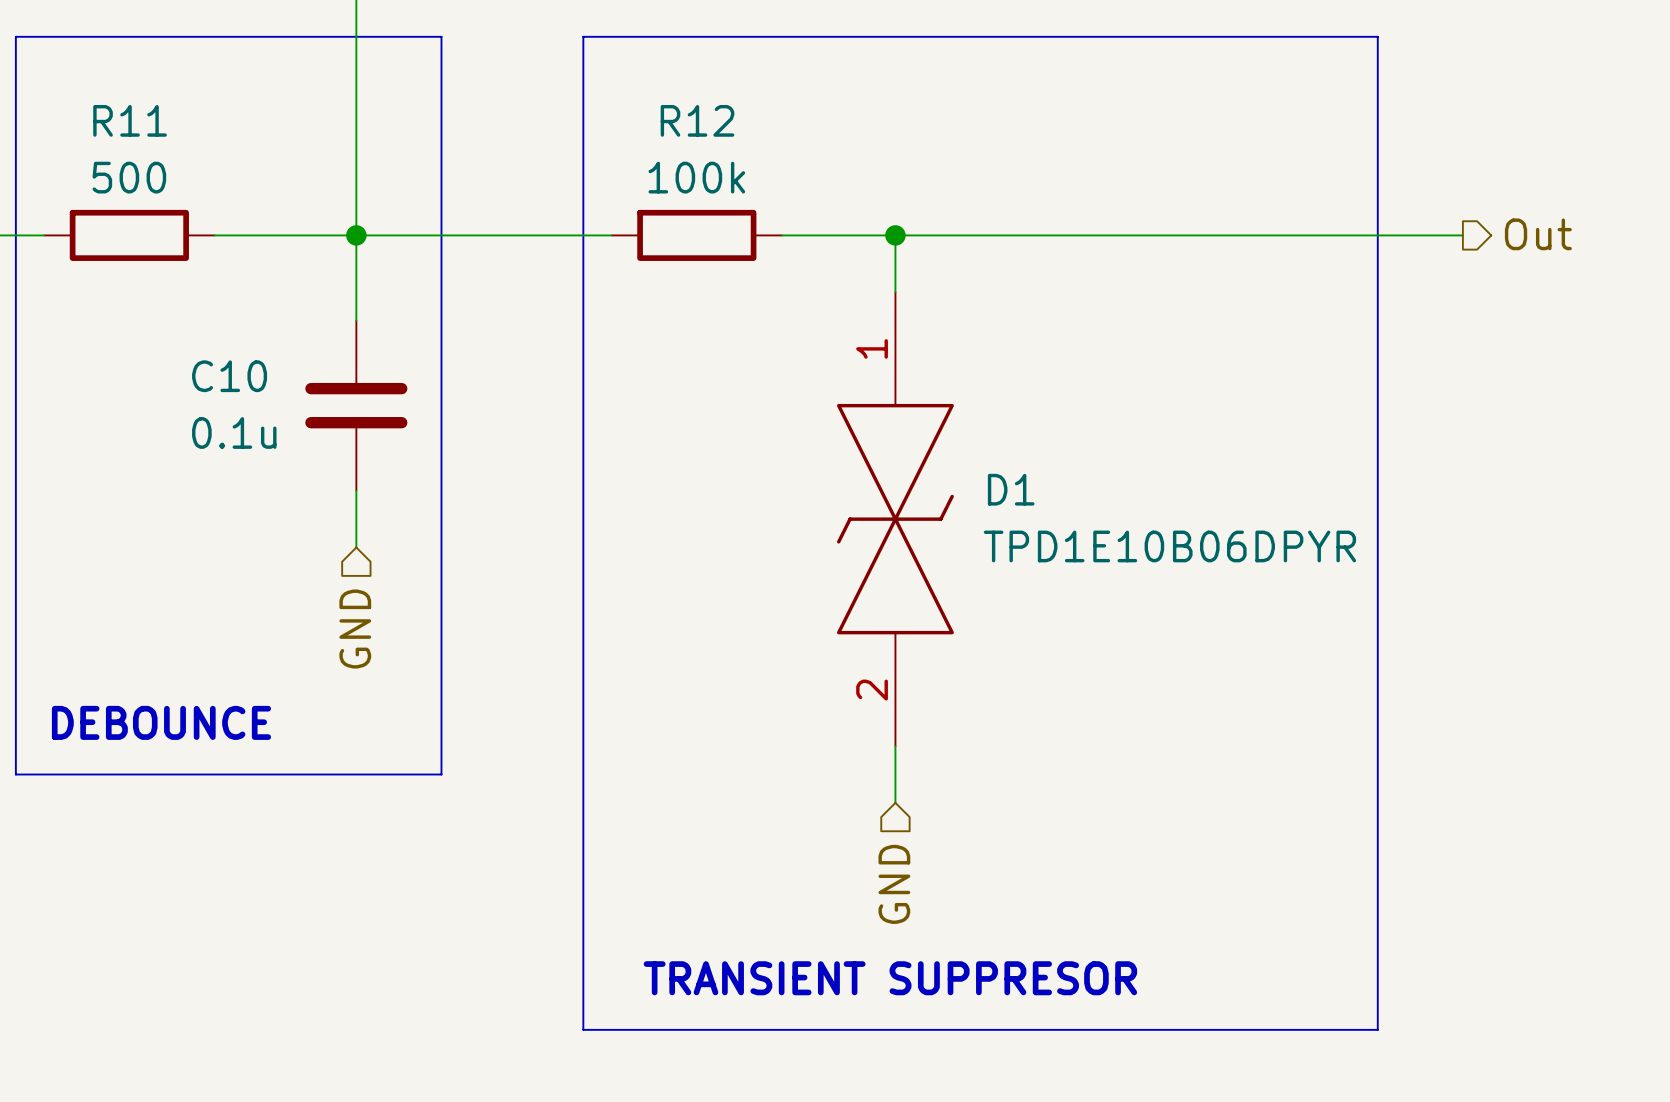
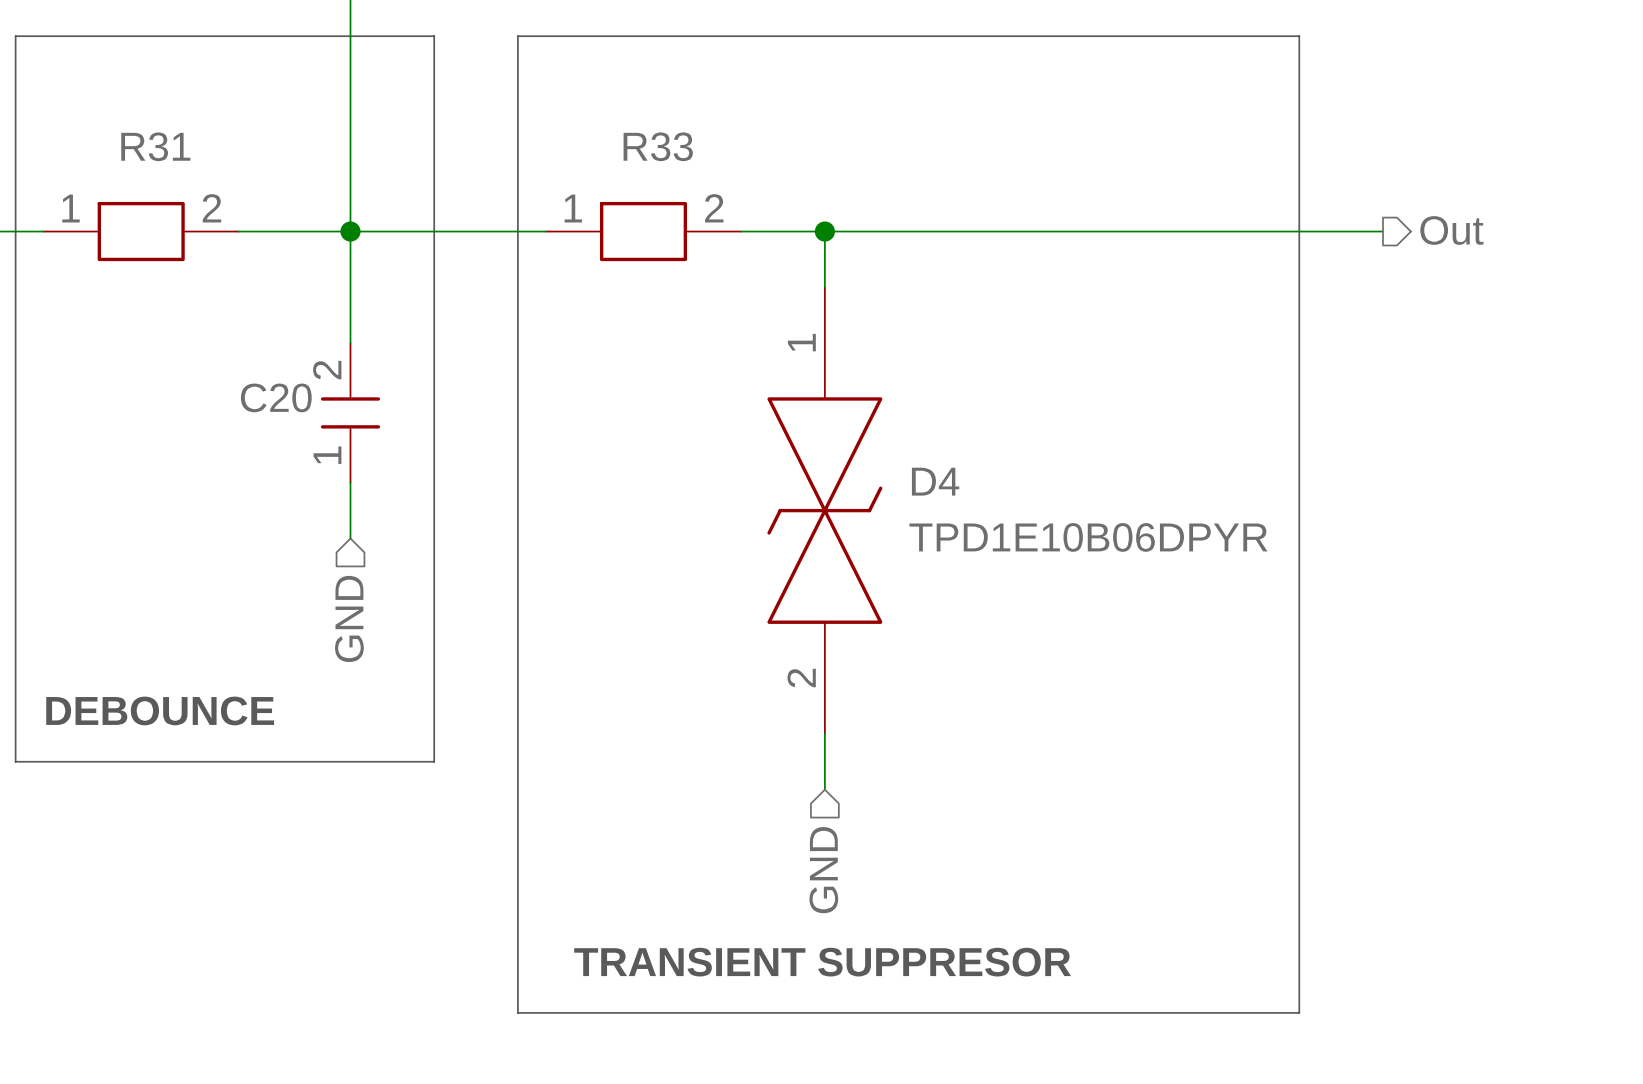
line: (583, 36) (583, 1029) -> (573, 36) (517, 36) (517, 1012) (573, 1012)
line: (1321, 36) (1377, 36) (1377, 1029) (1321, 1029) -> (1299, 36) (1299, 1012)
hierarchical label position: Out (1538, 234) -> Out (1451, 230)
R11: 500 (129, 235) -> none
R31: none -> (141, 231)
R33: none -> (643, 231)
R12: 100k (696, 235) -> none
wire: (895, 235) (895, 292) -> (824, 231) (824, 287)
junction position: (895, 235) -> (824, 231)
wire: (1406, 235) (1462, 235) -> none
C10: 0.1u (356, 405) -> none
C20: none -> (350, 412)
D4: none -> TPD1E10B06DPYR (824, 510)
D1: TPD1E10B06DPYR (895, 519) -> none
wire: (895, 746) (895, 802) -> (824, 733) (824, 789)
hierarchical label position: GND (894, 884) -> GND (823, 870)
text position: TRANSIENT SUPPRESOR (890, 978) -> TRANSIENT SUPPRESOR (822, 962)

